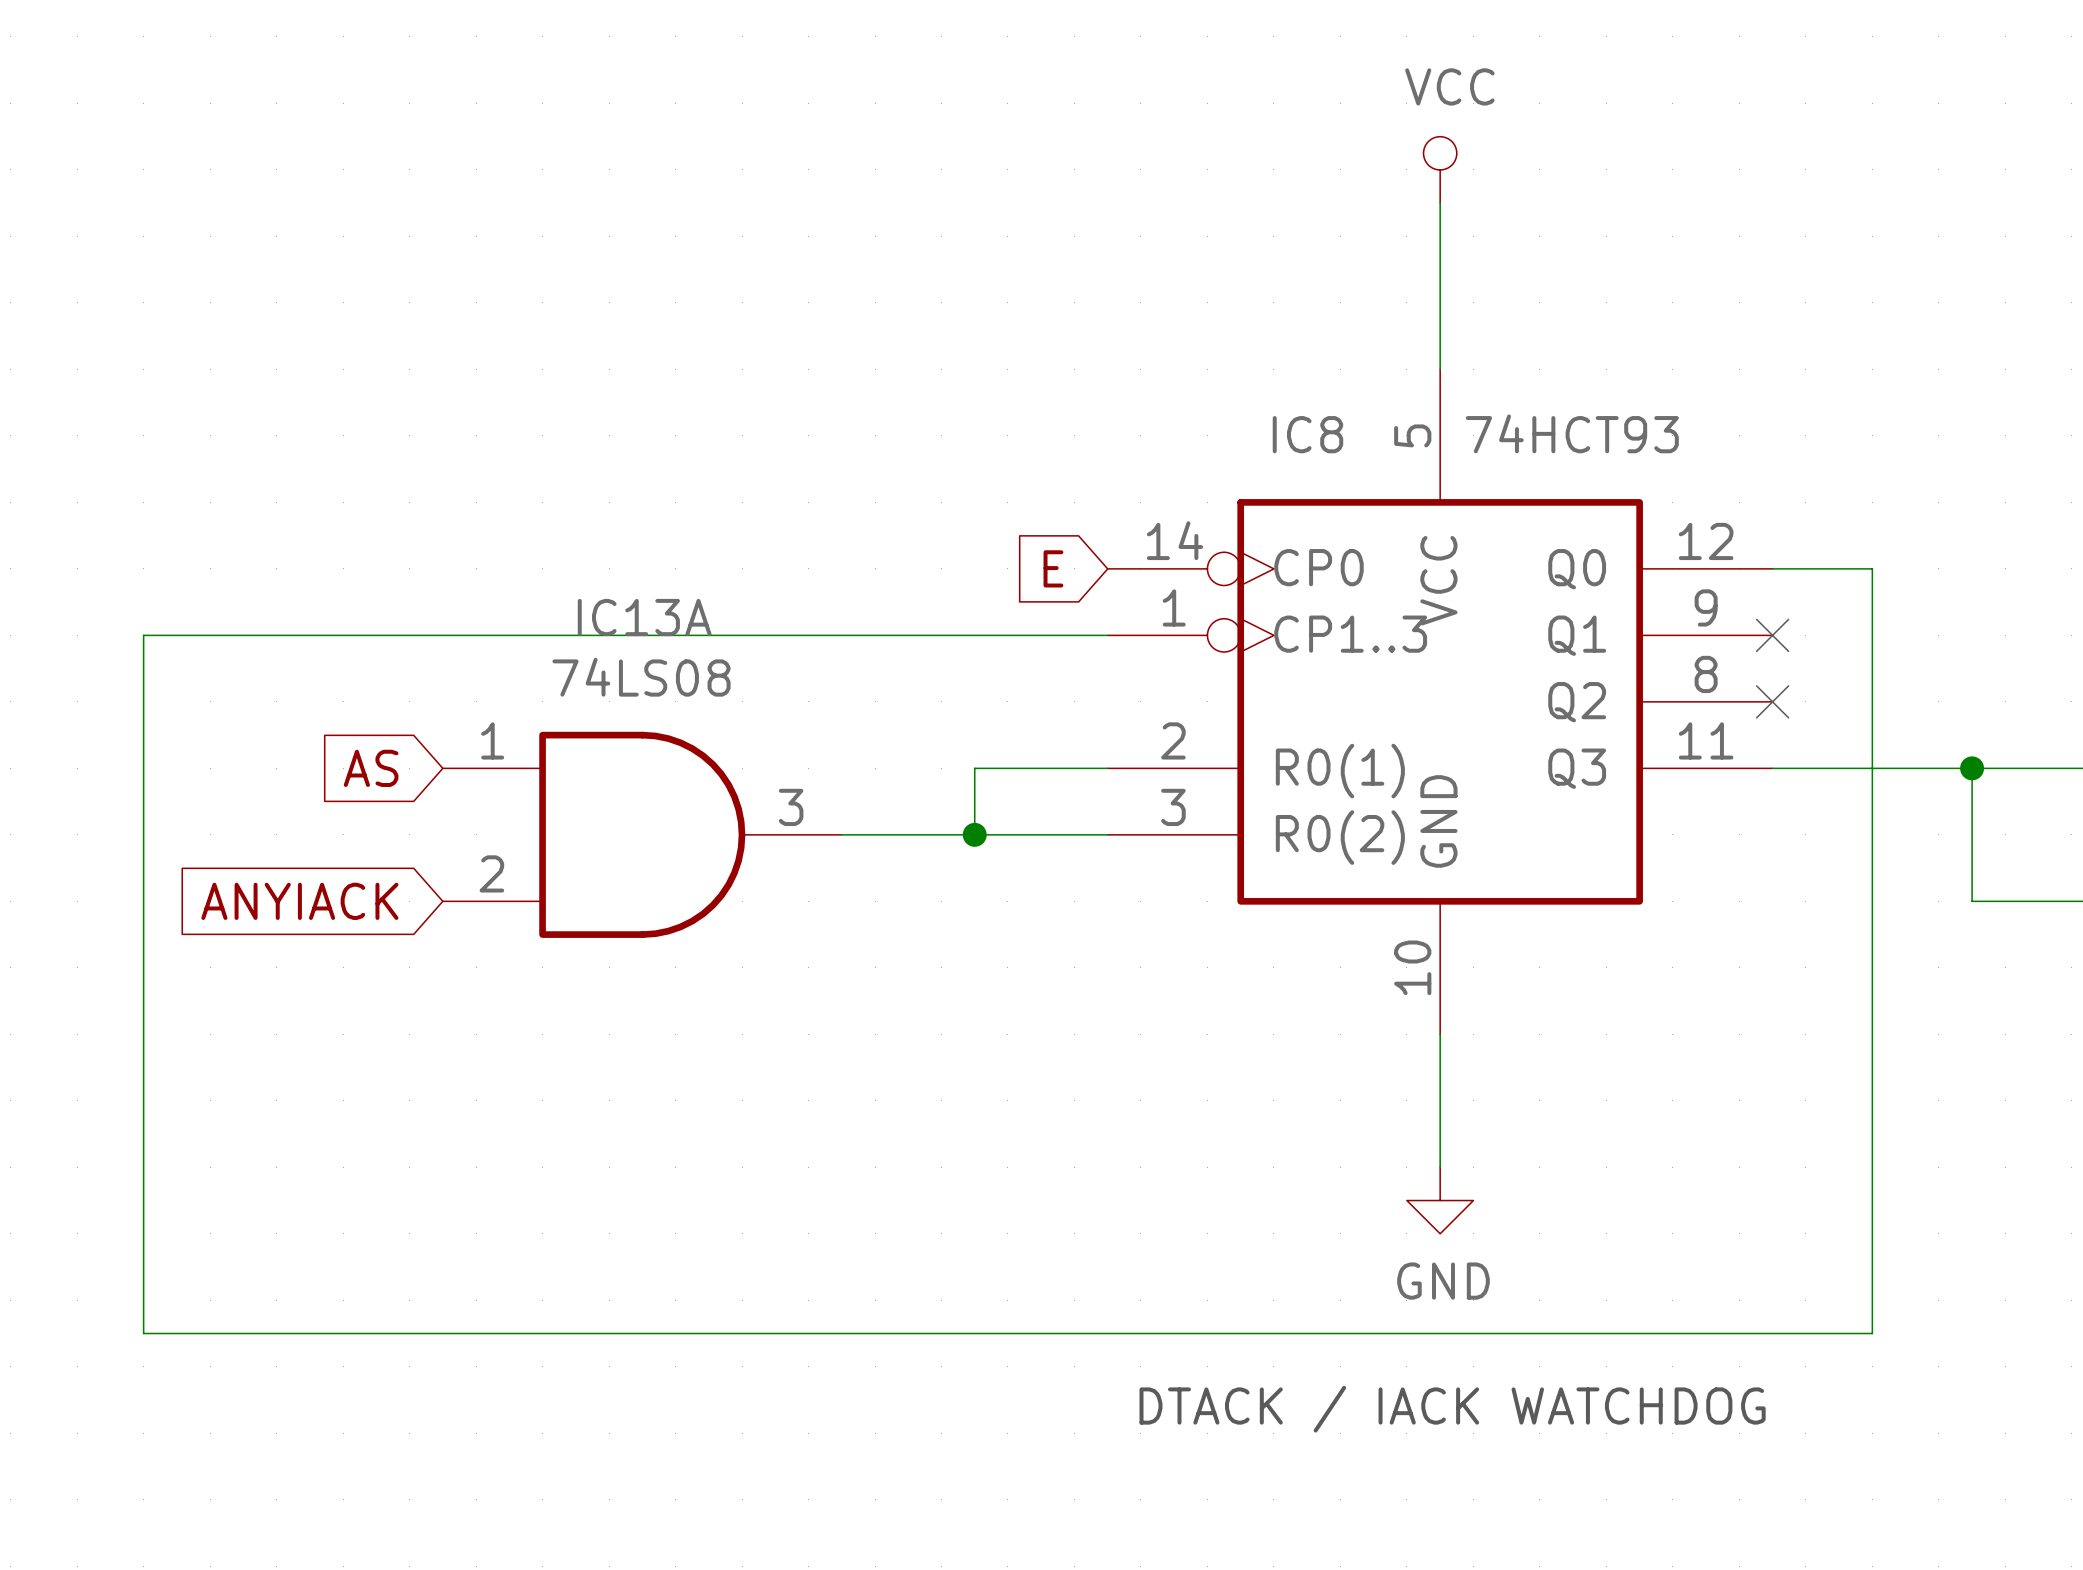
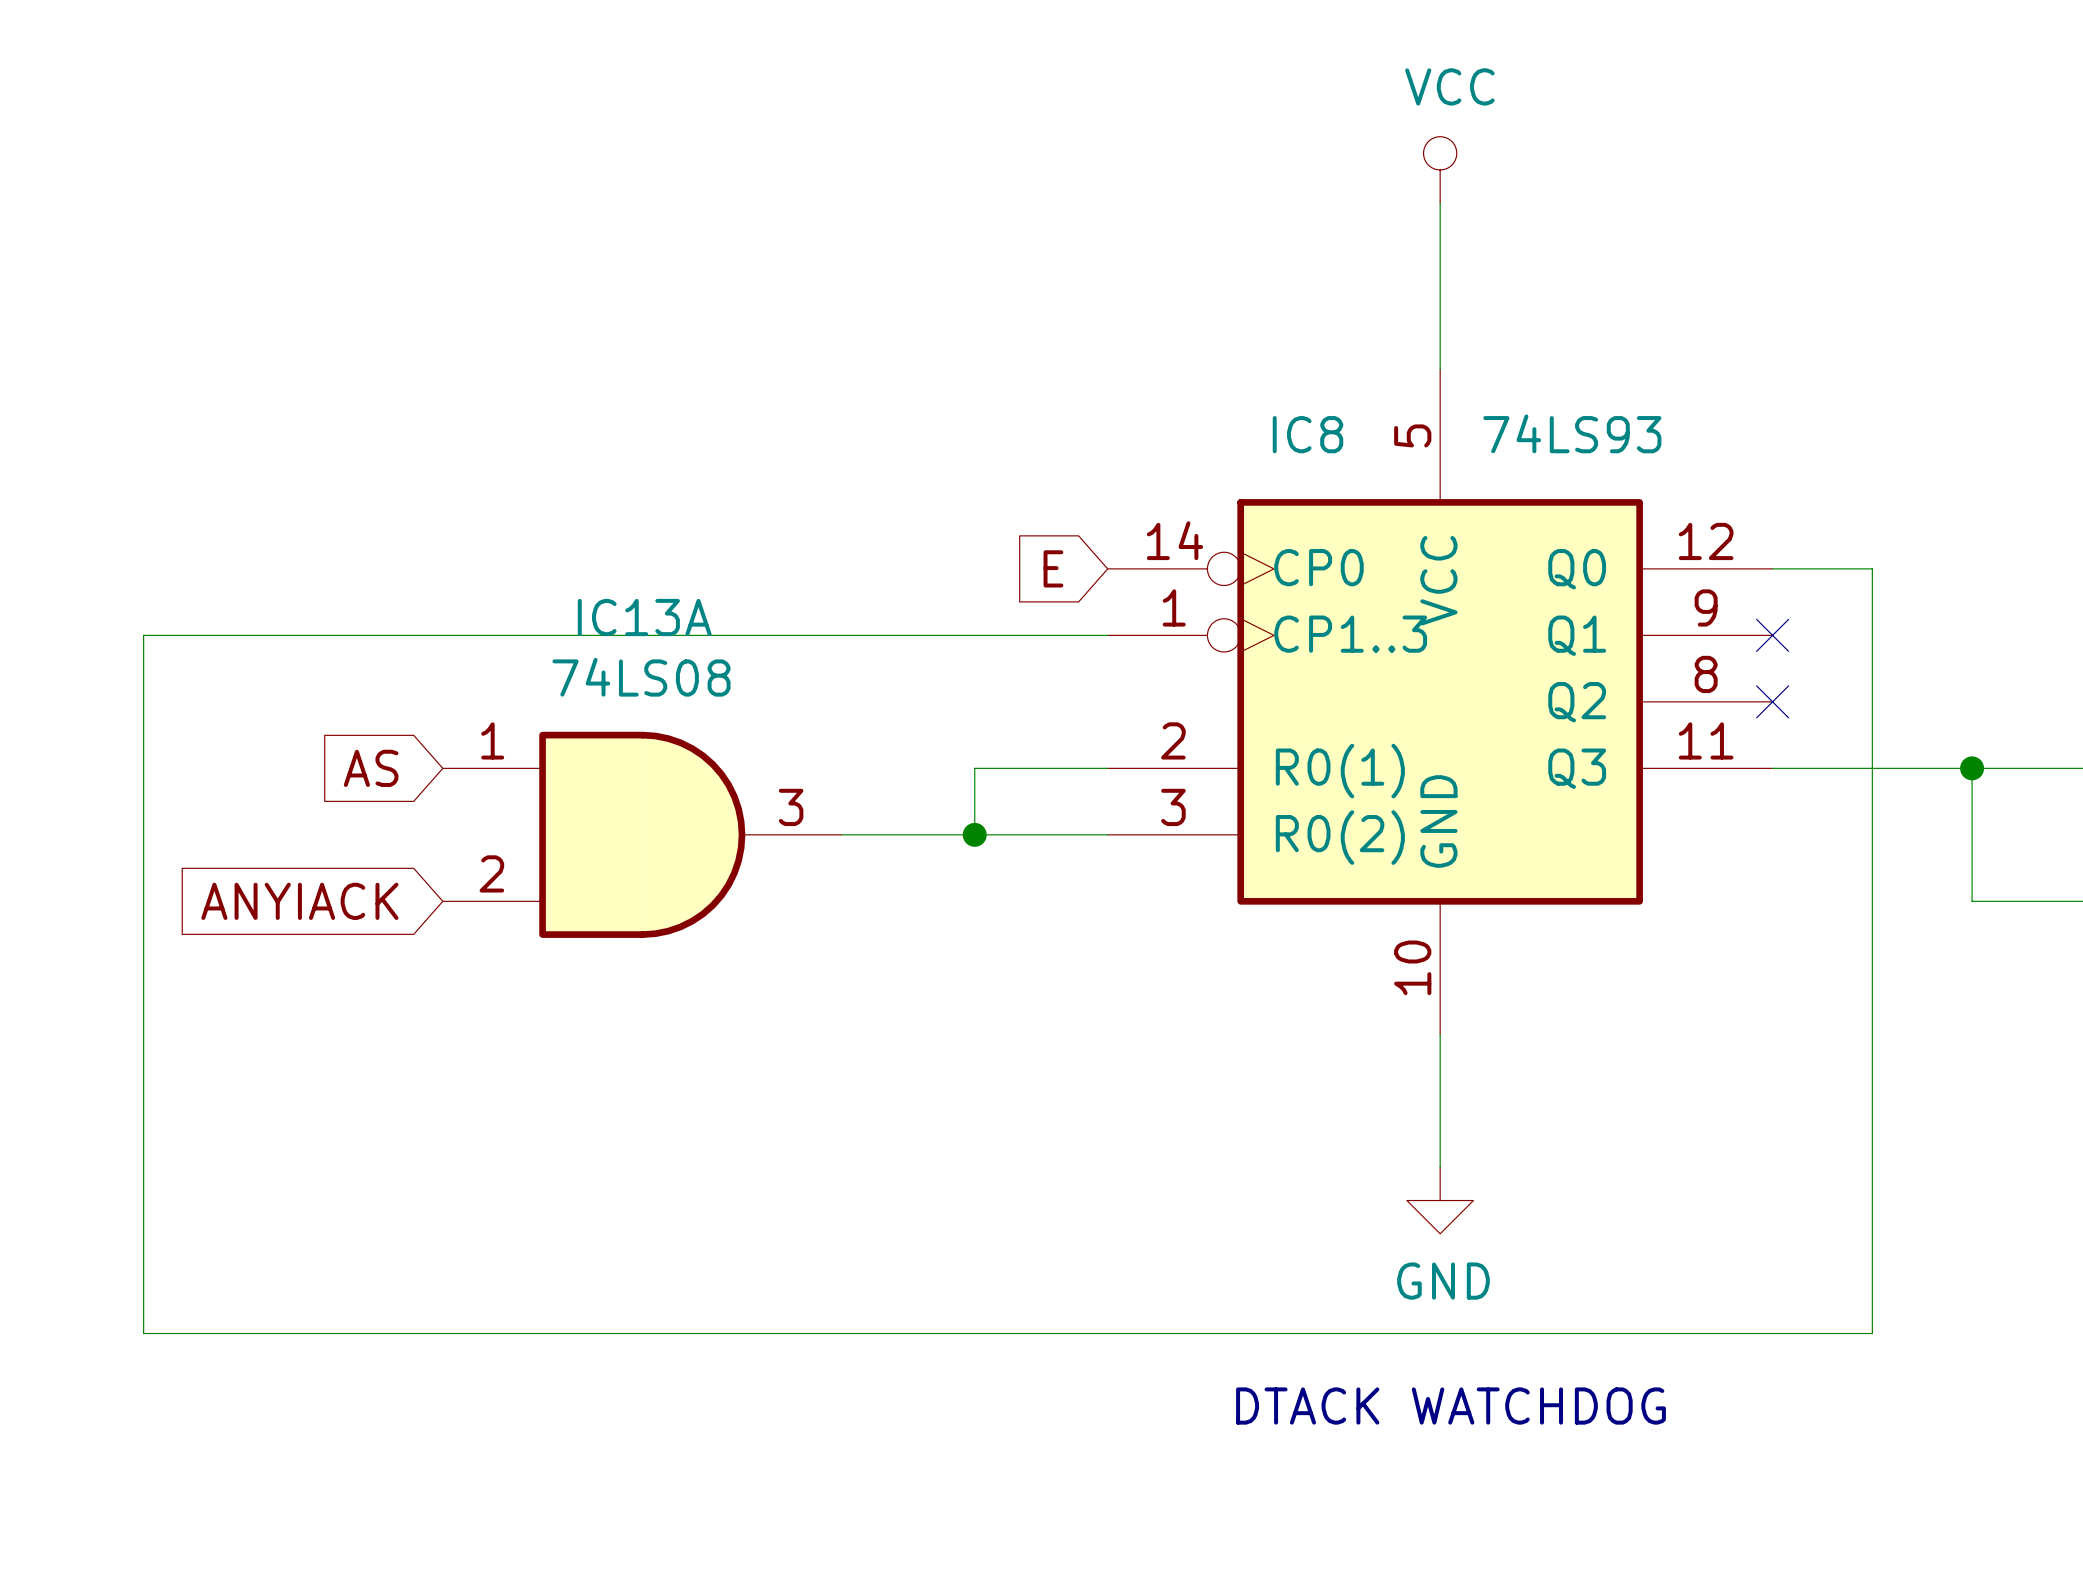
IC8 value: 74HCT93 (1572, 433) -> 74LS93 (1572, 433)
text: DTACK / IACK WATCHDOG (1452, 1409) -> DTACK WATCHDOG (1450, 1406)

